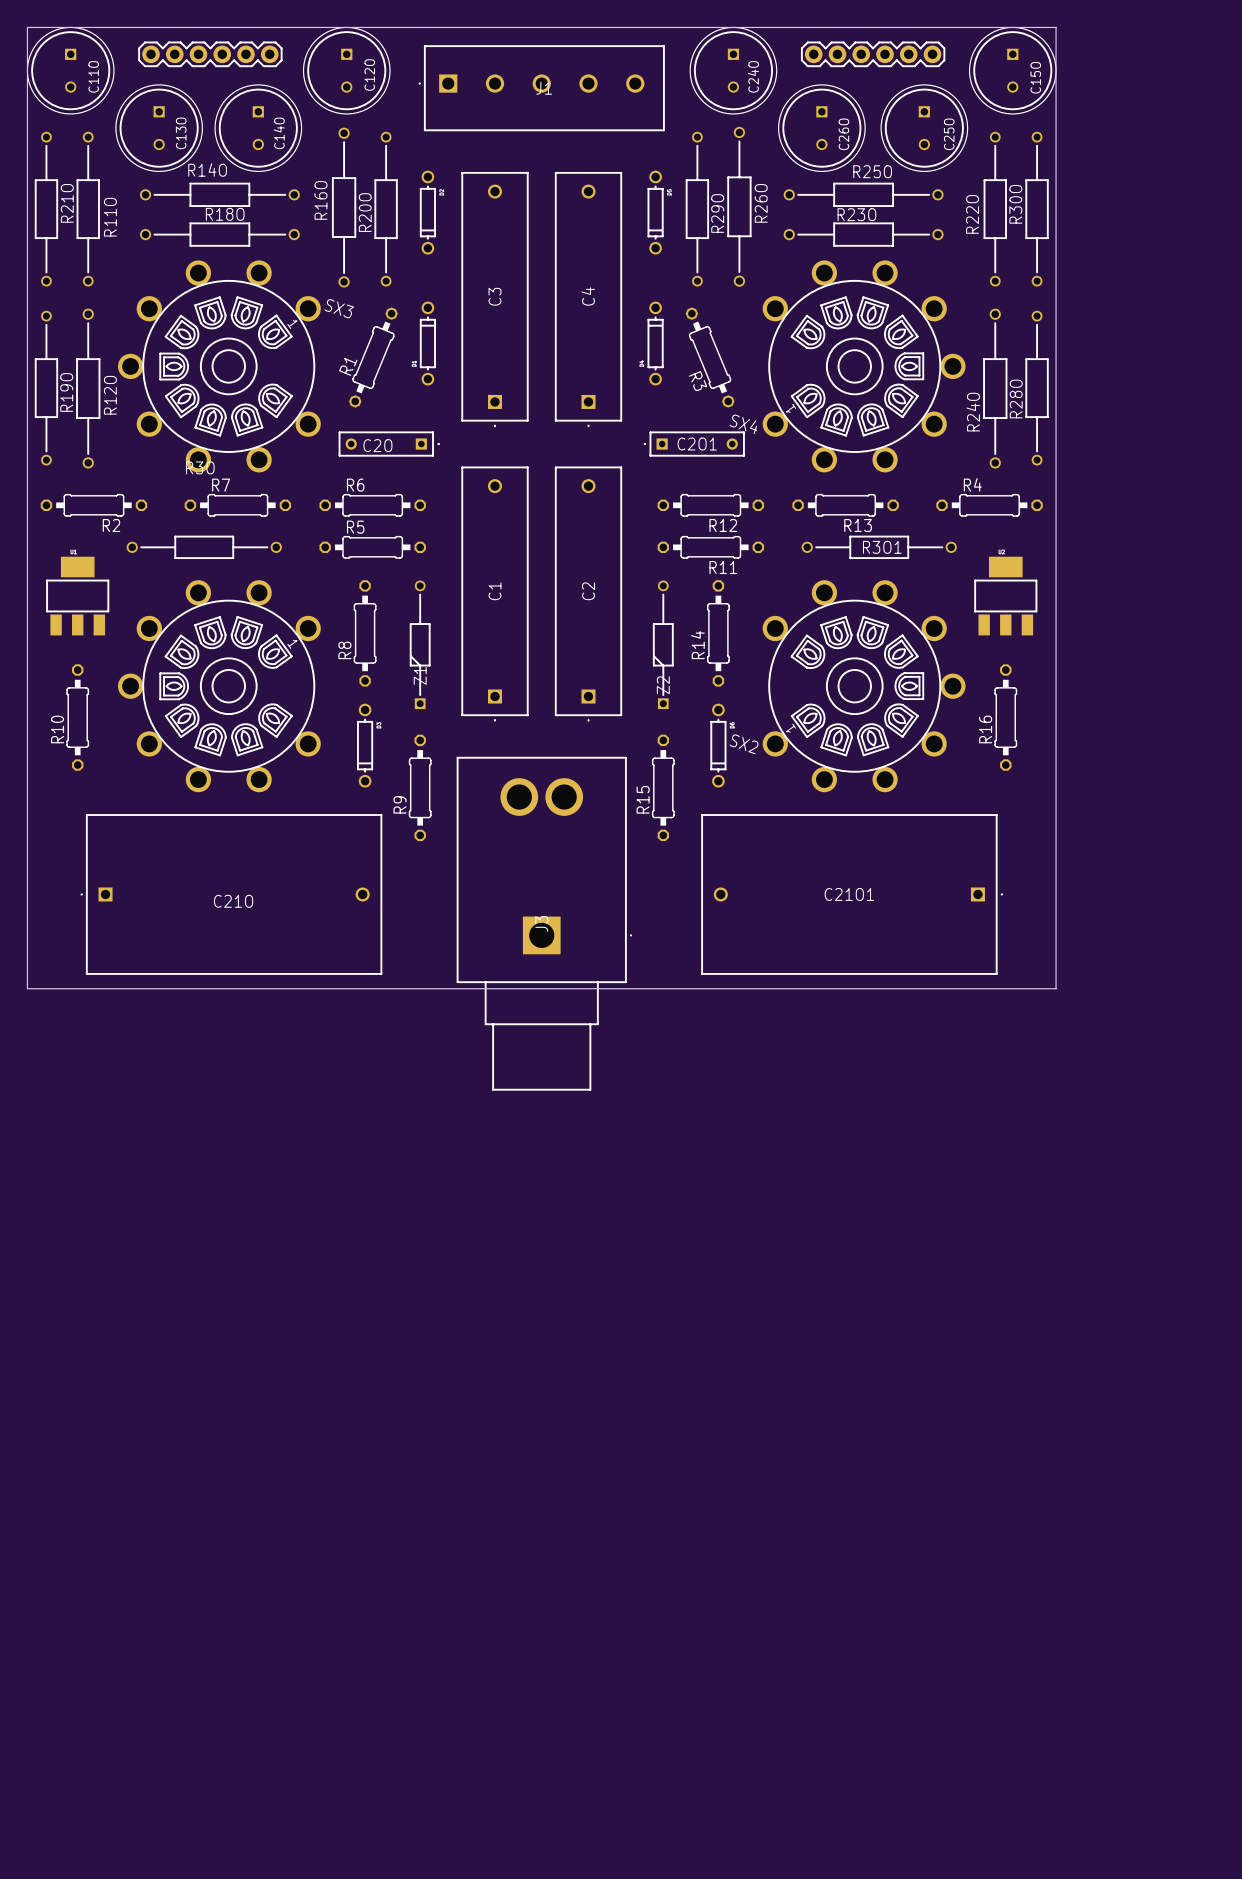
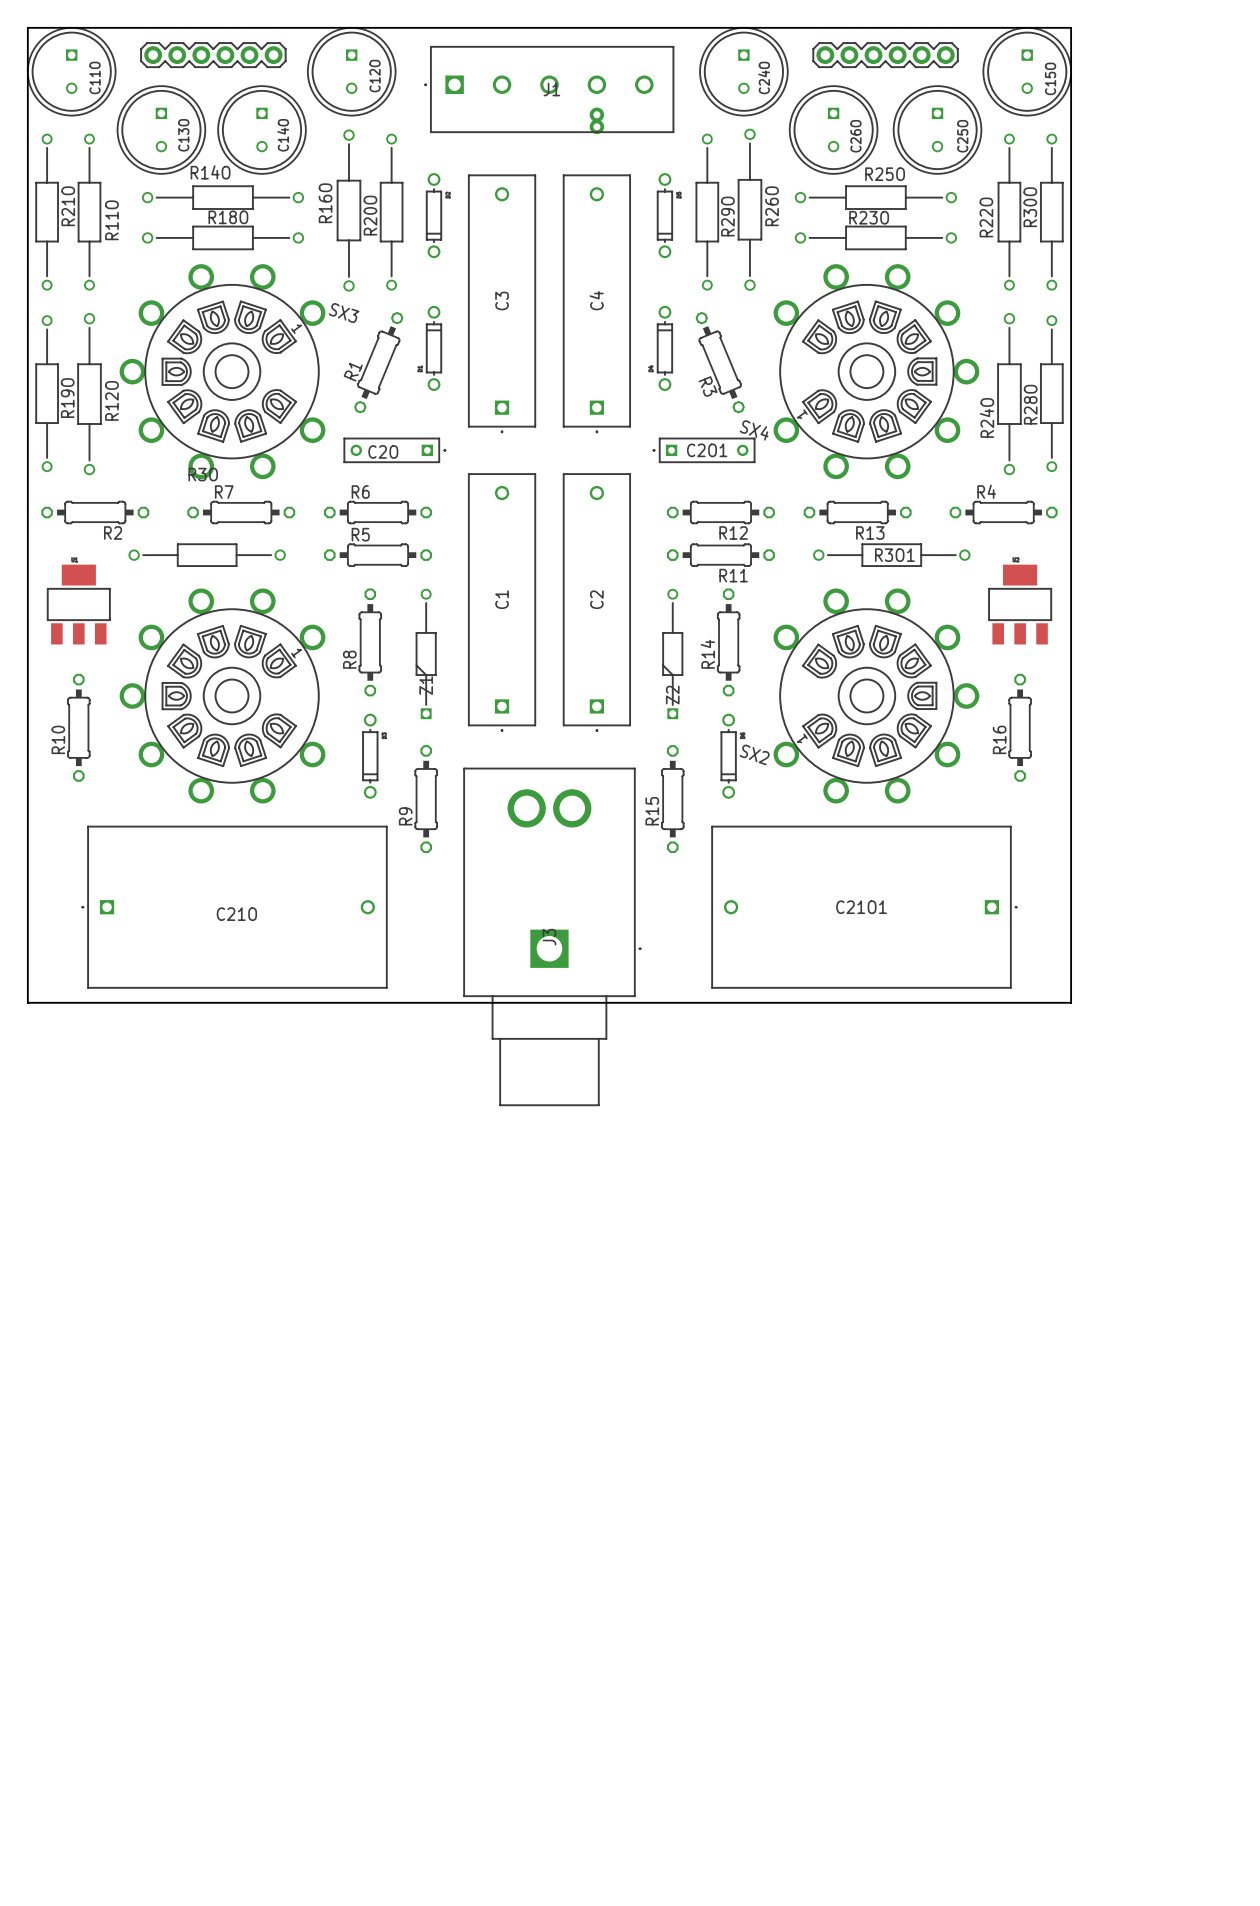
part: none -> (596, 120)

